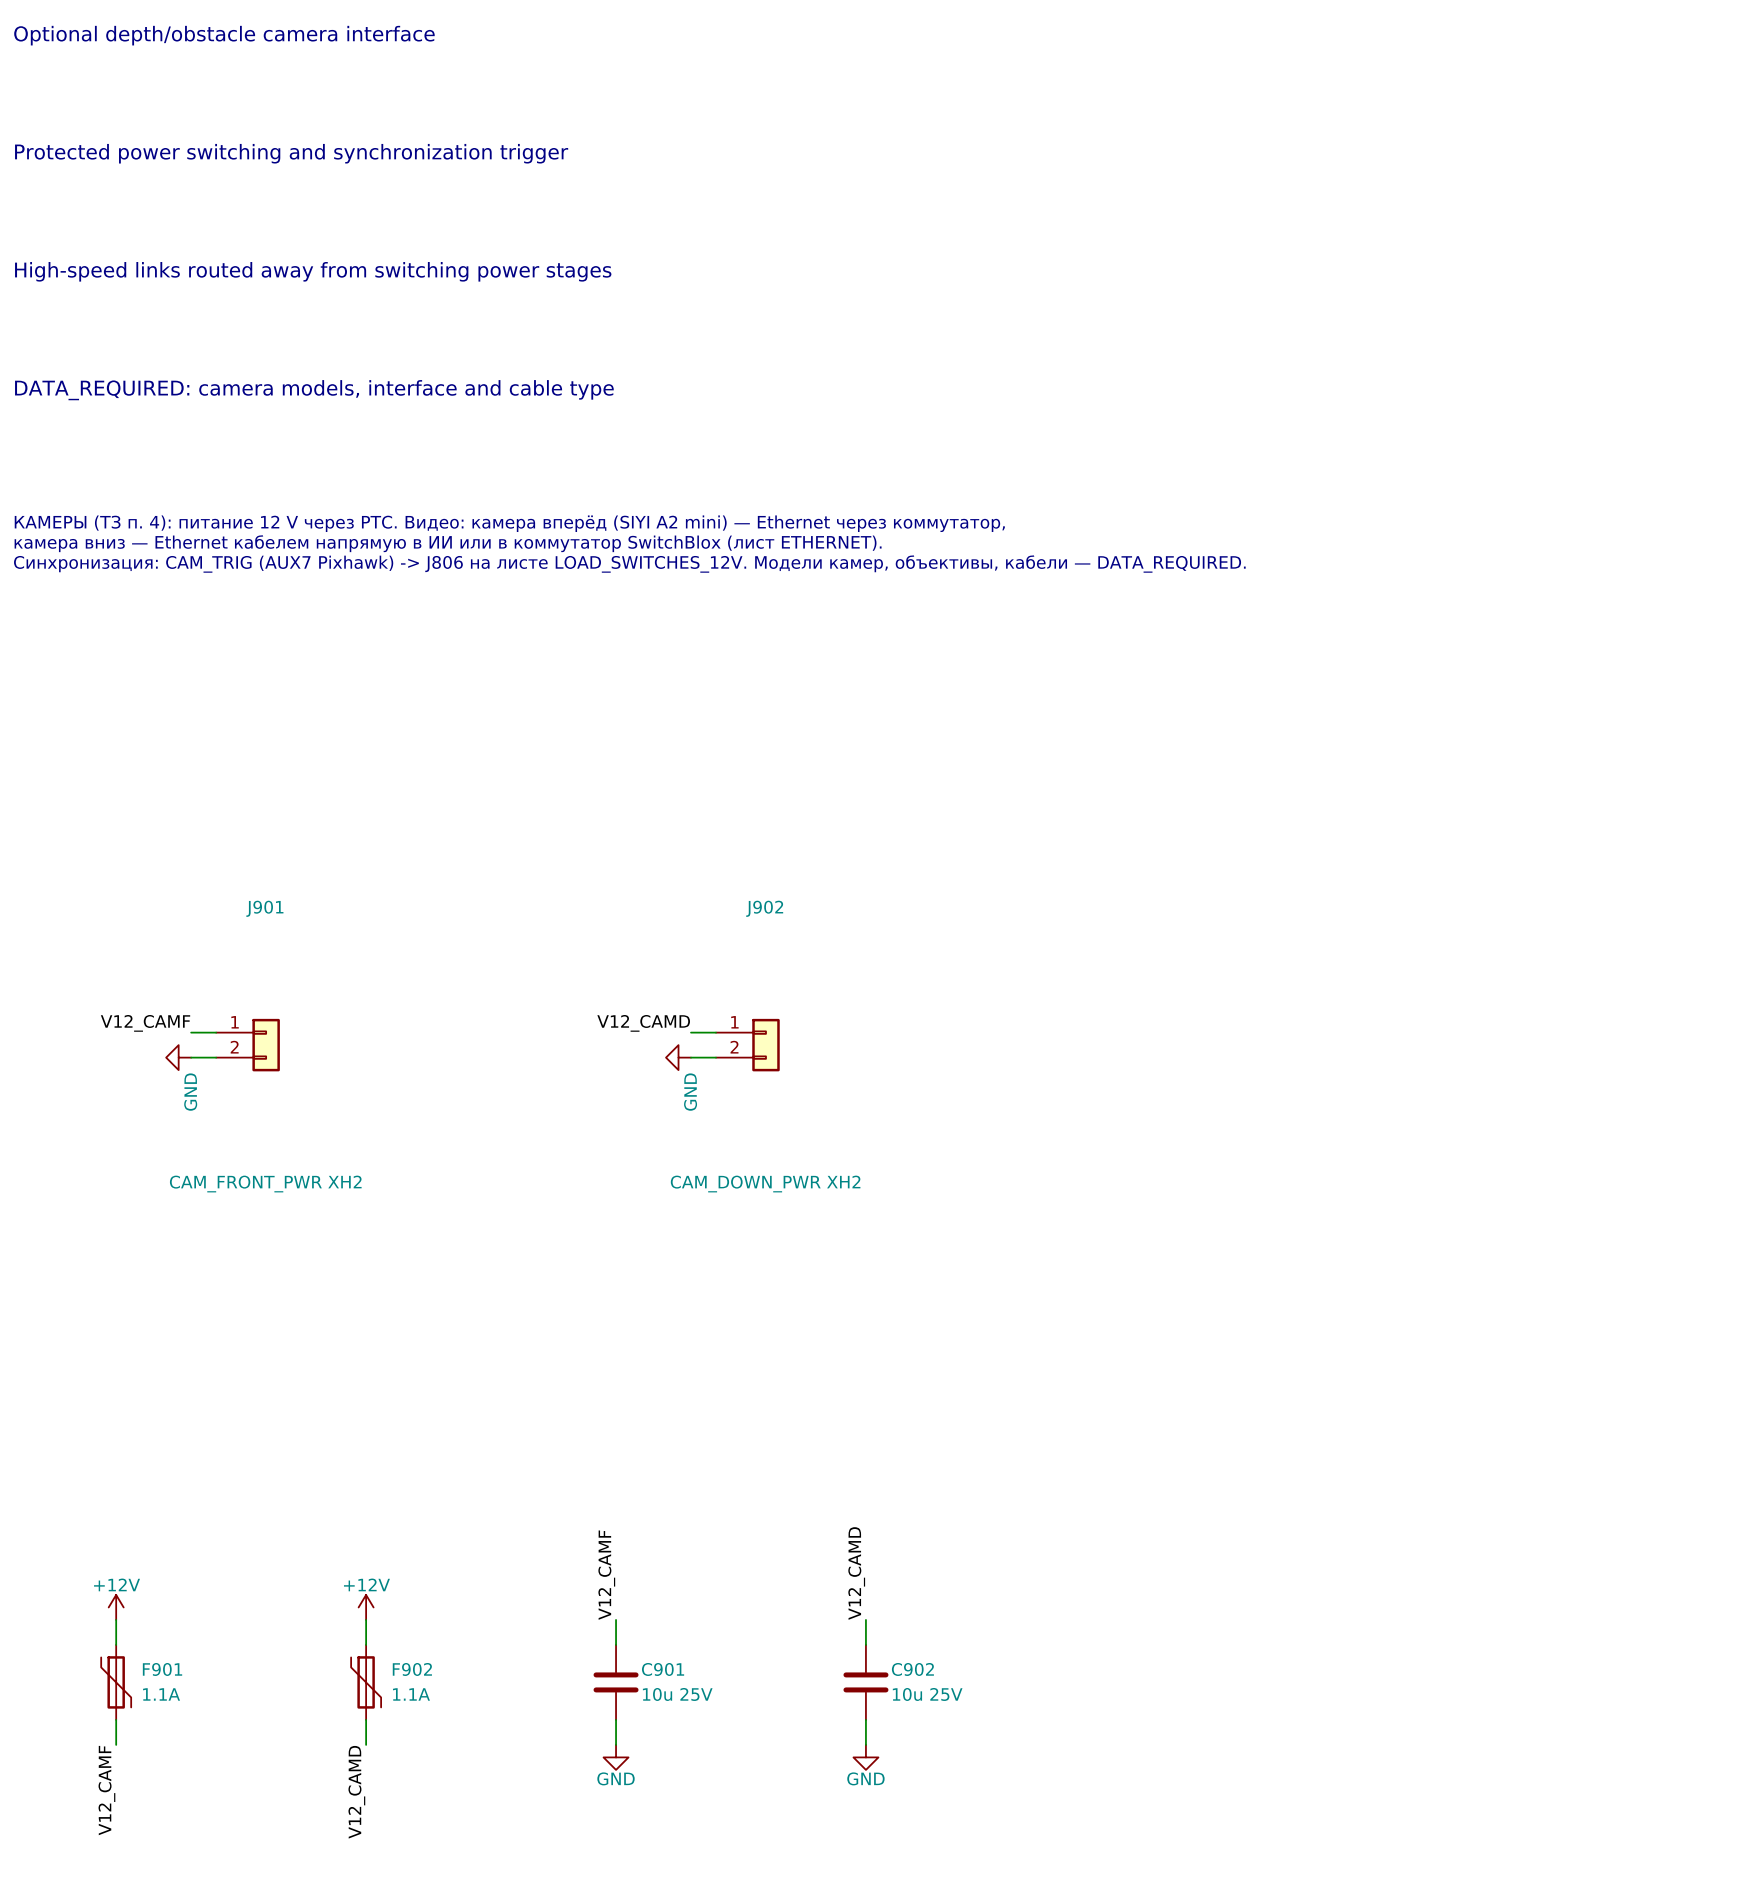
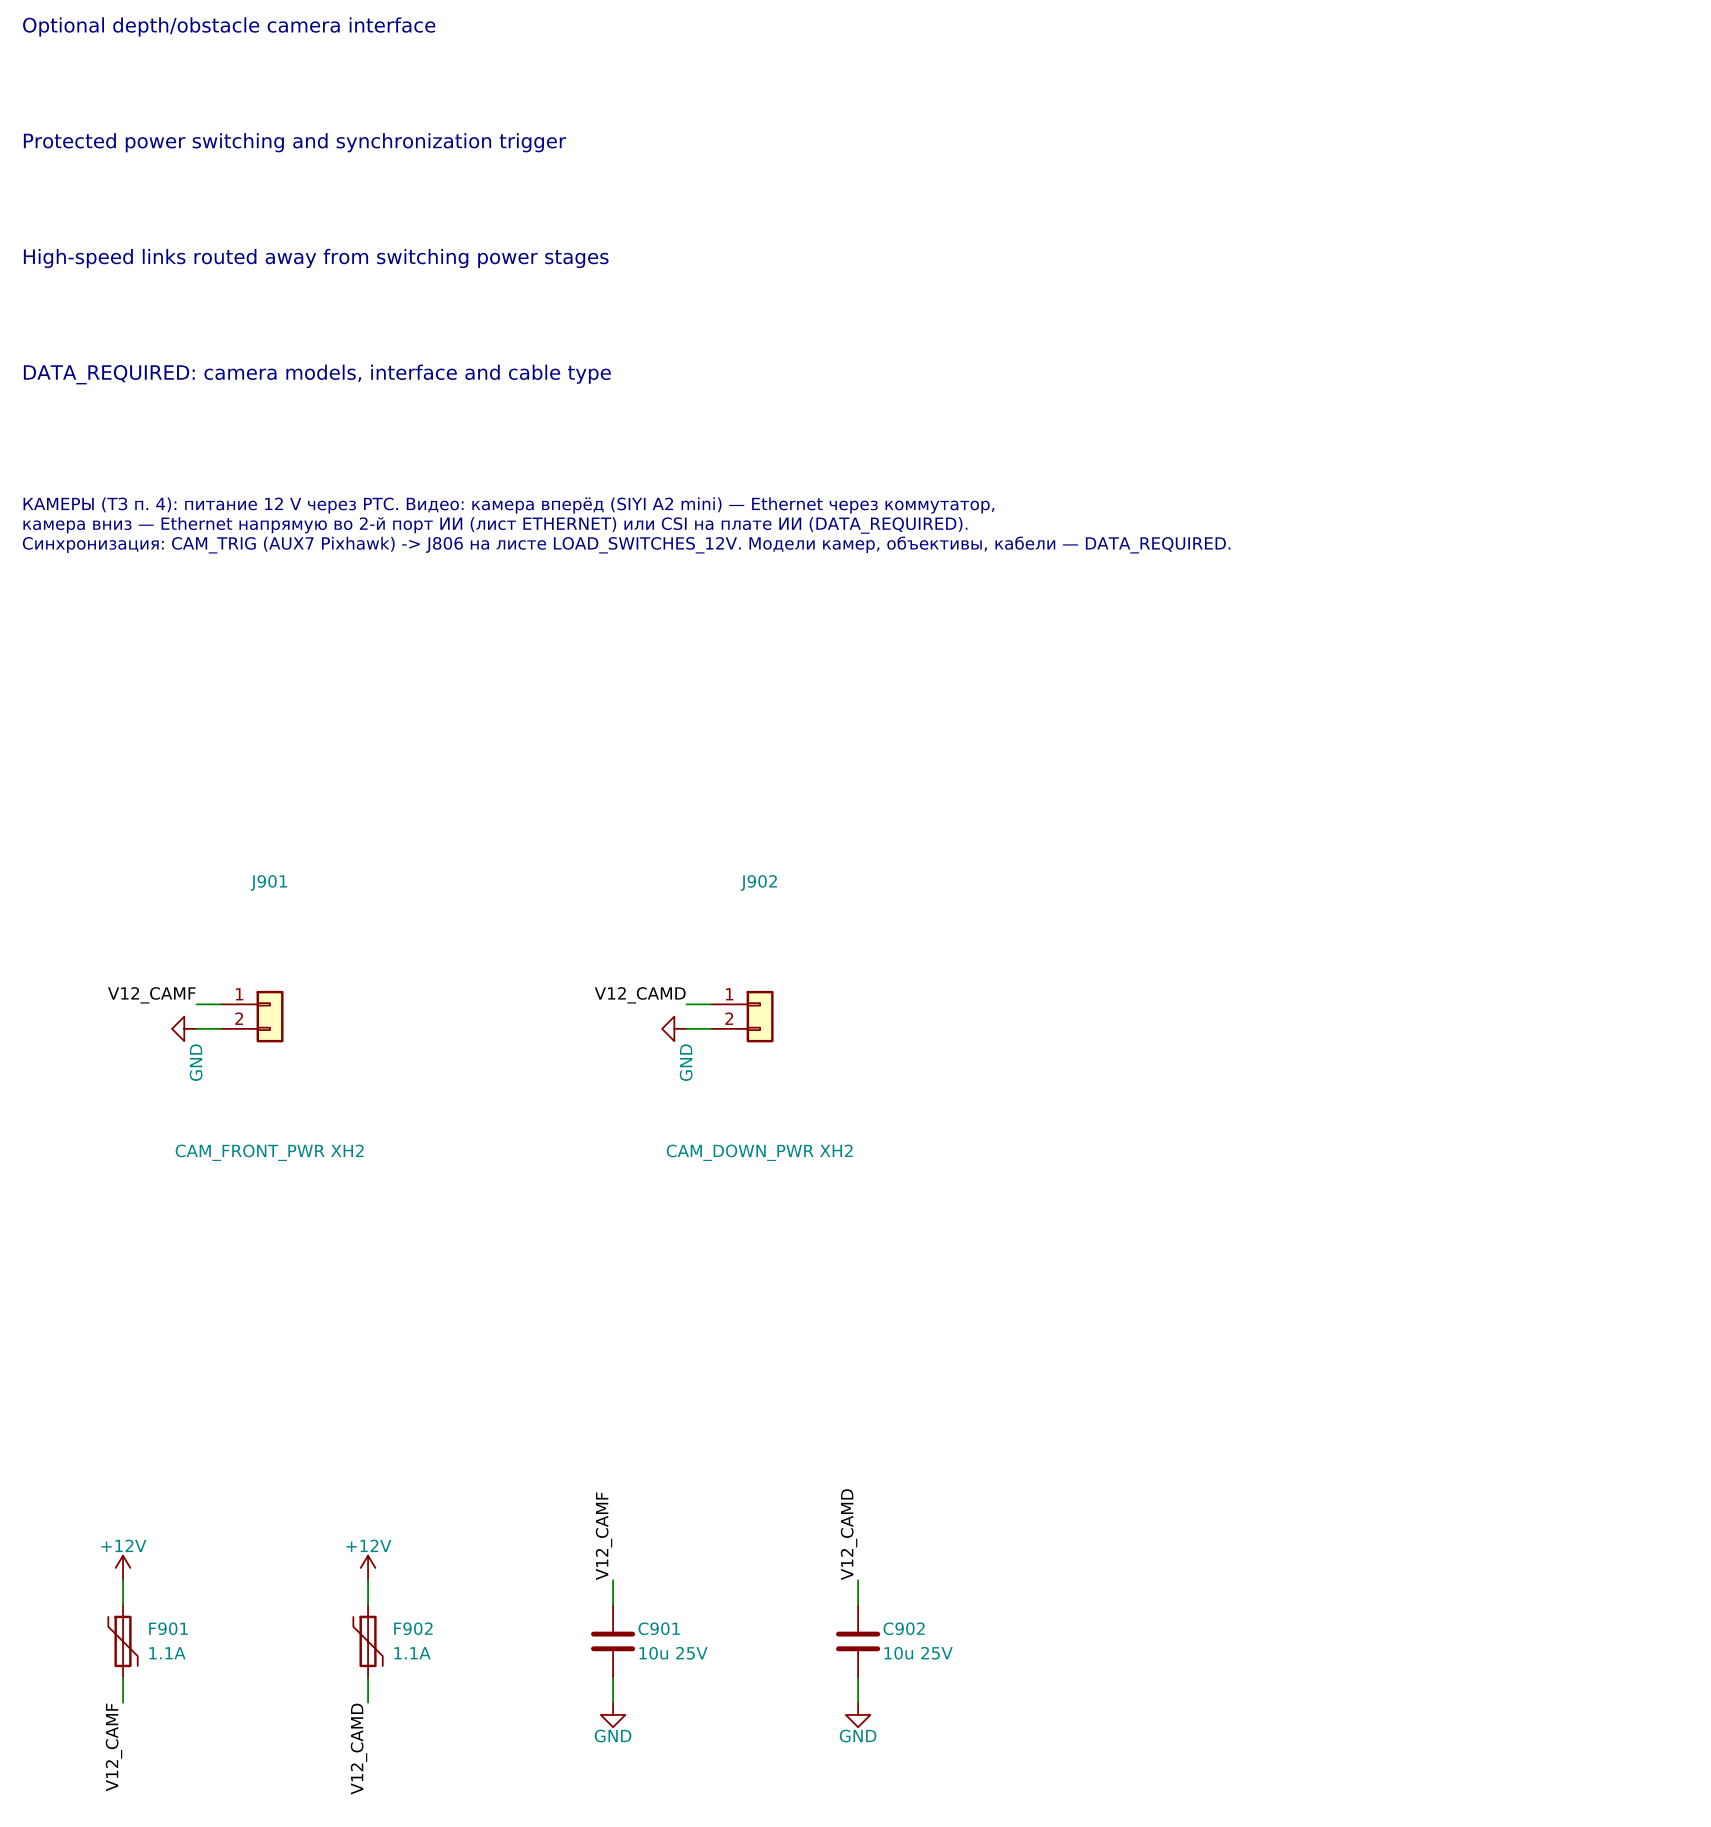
text: камера вниз — Ethernet кабелем напрямую в ИИ или в коммутатор SwitchBlox (лист ETHERNET). (448, 543) -> камера вниз — Ethernet напрямую во 2-й порт ИИ (лист ETHERNET) или CSI на плате ИИ (DATA_REQUIRED). (495, 525)

